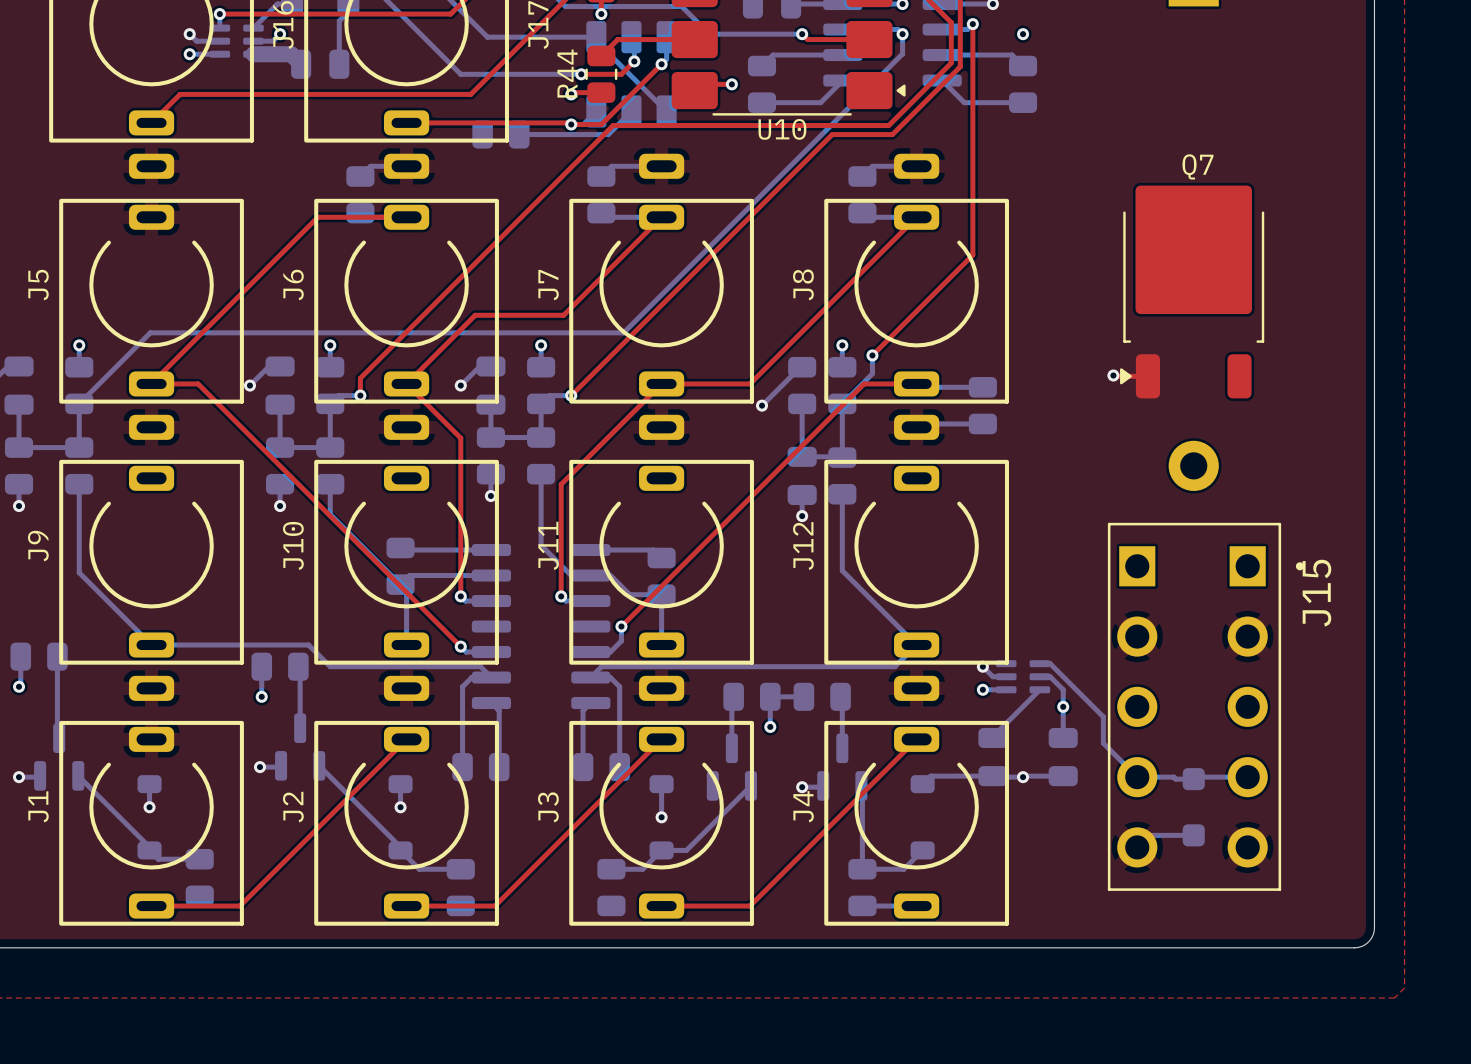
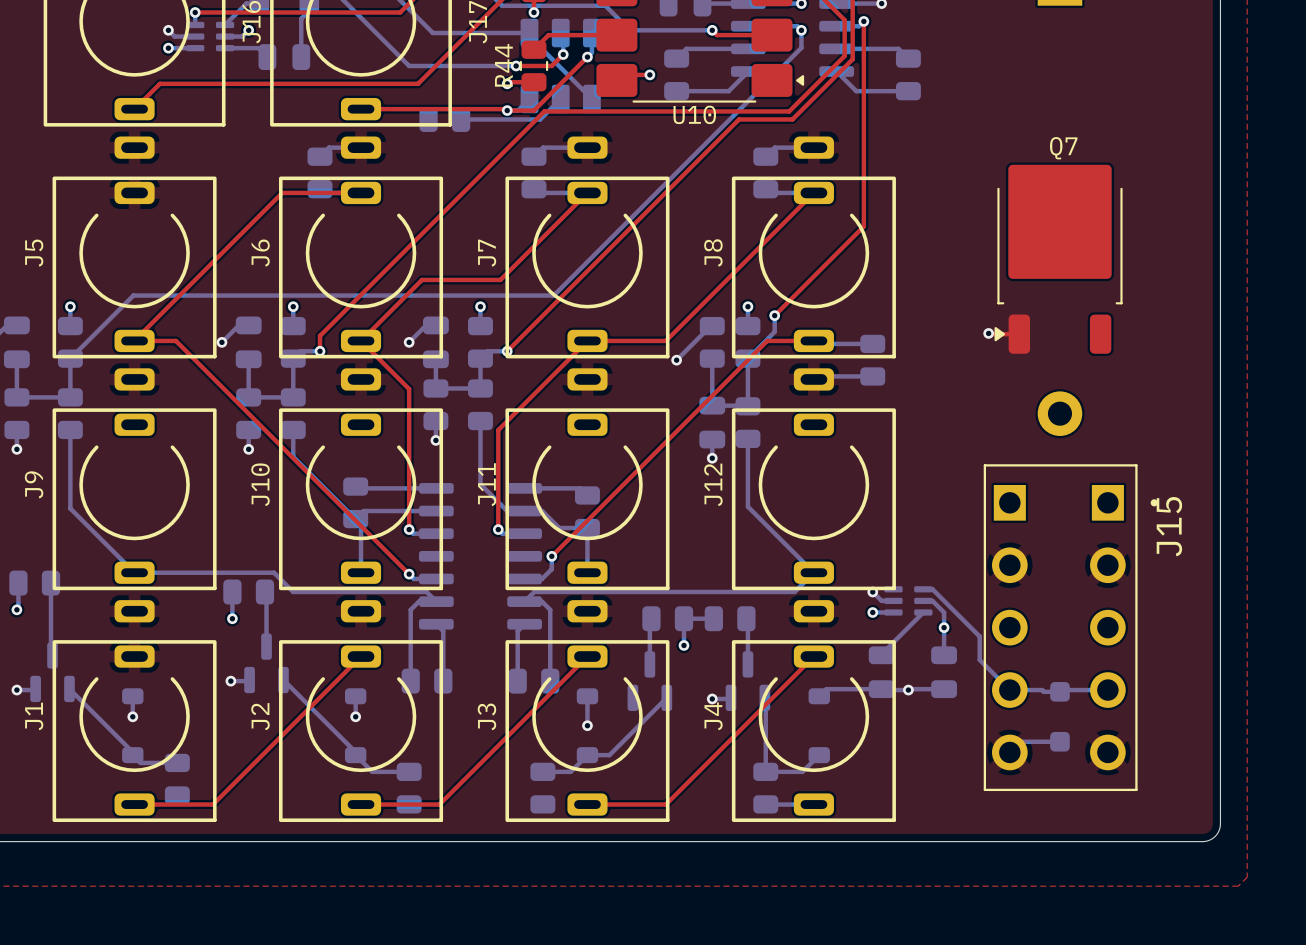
via: (1023, 34) -> none
bottom track width: thick (253, 54) (291, 54) (301, 64) -> thin (225, 48) (258, 48) (267, 57)

